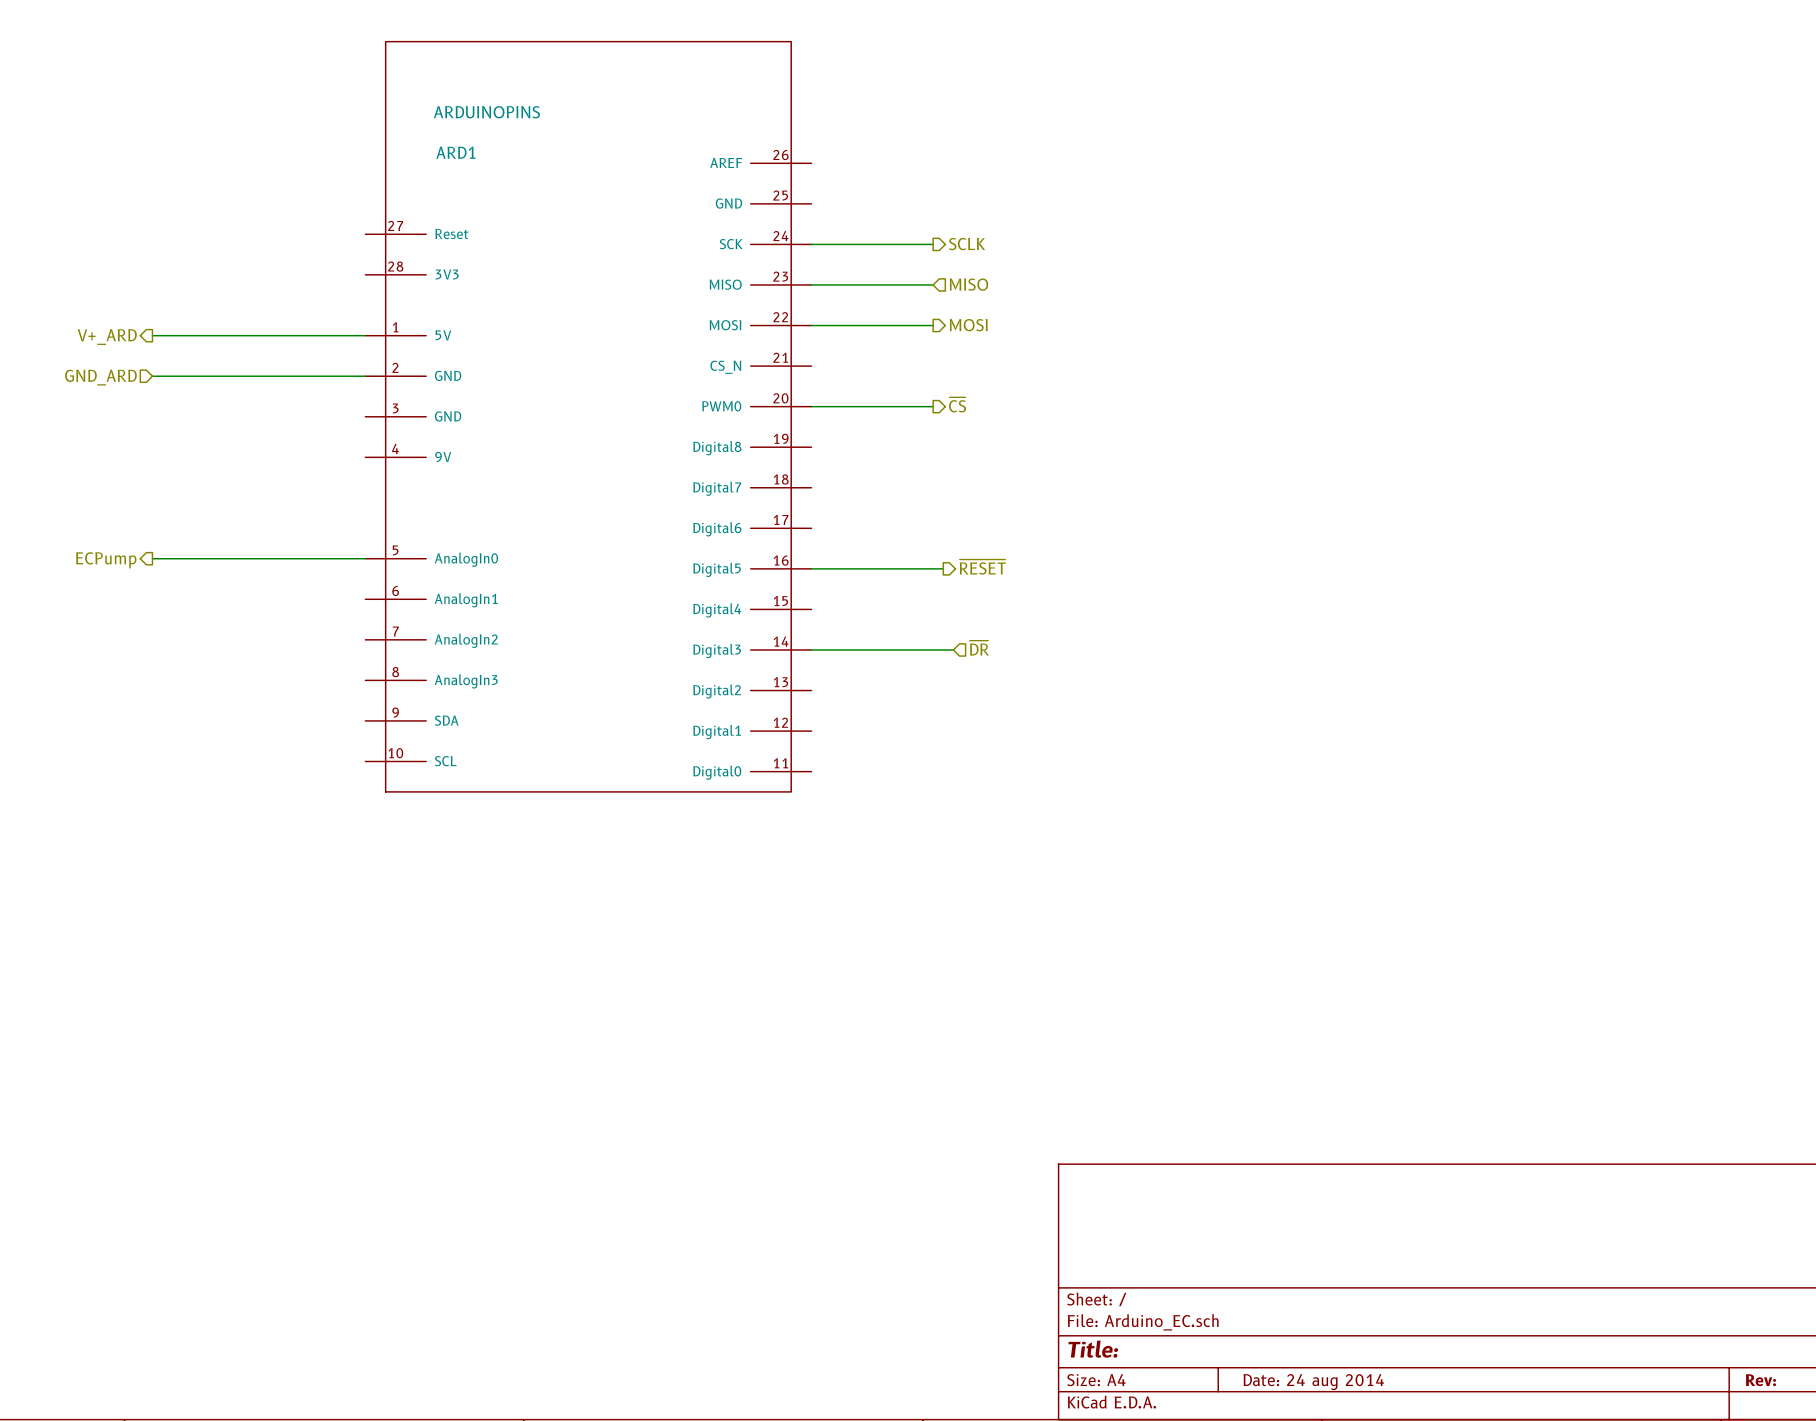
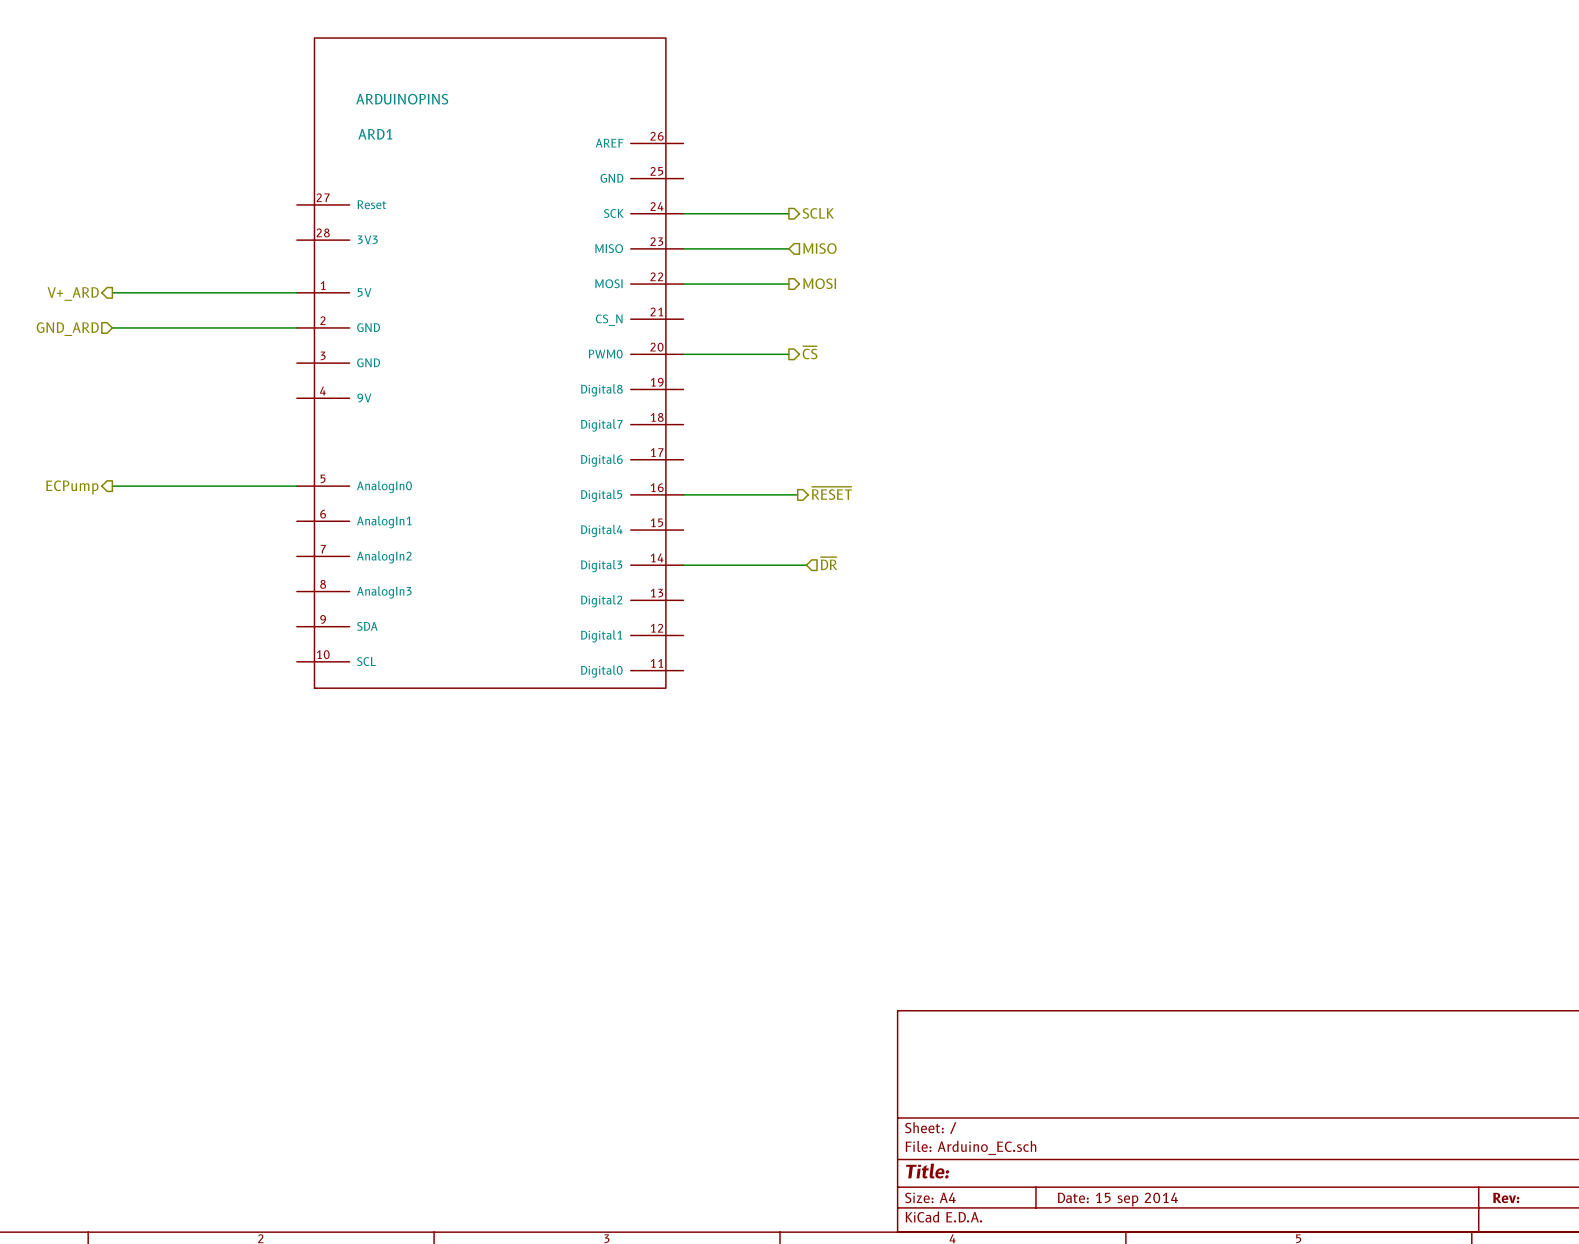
title block: Date: 24 aug 2014 (1313, 1382) -> Date: 15 sep 2014 (1117, 1199)

